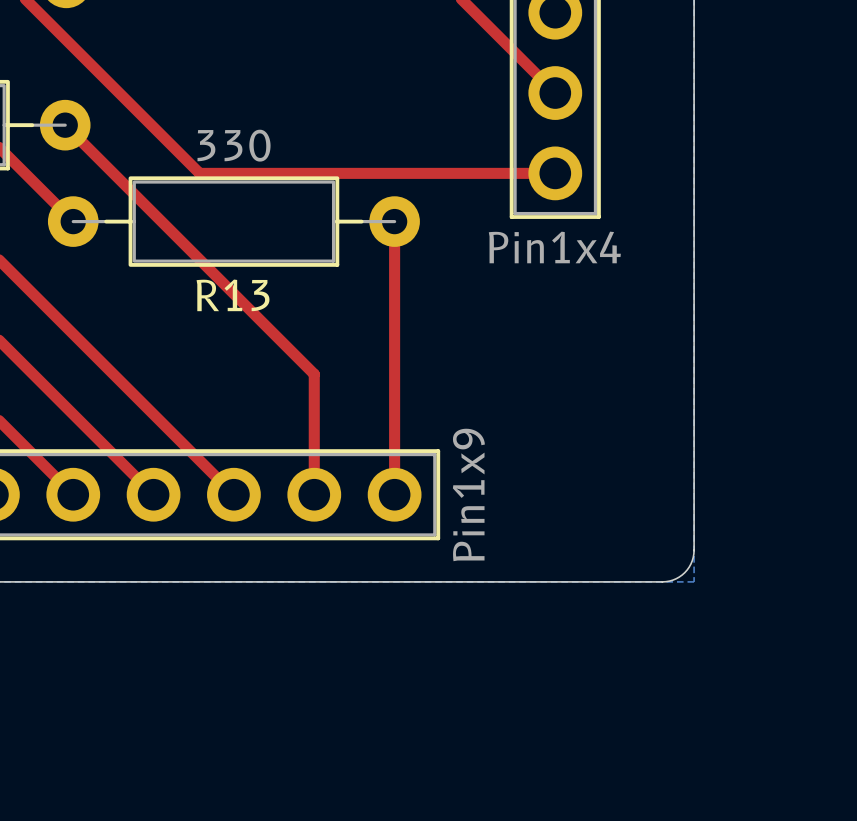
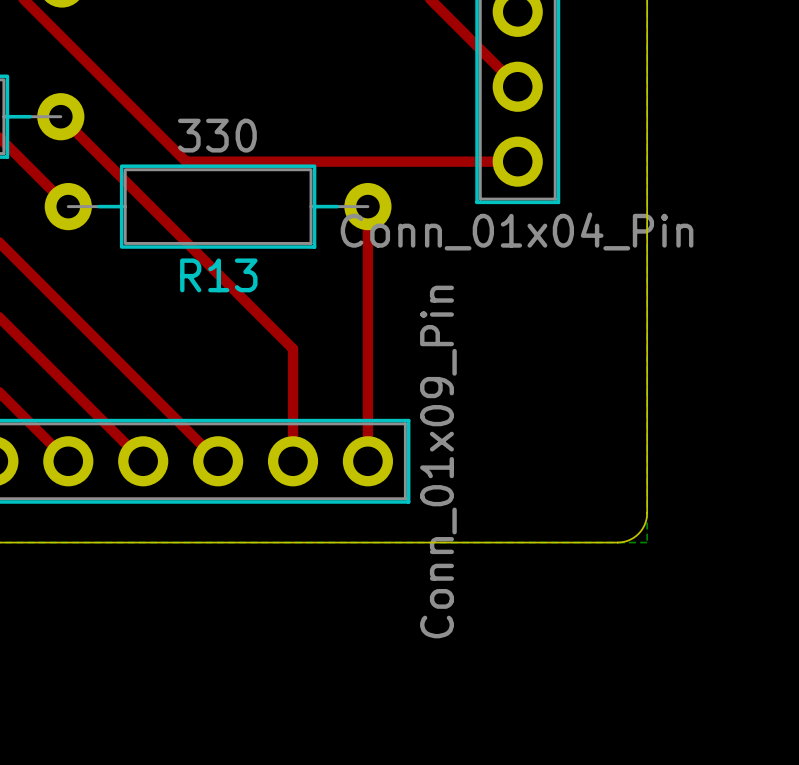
part value: Pin1x4 (554, 247) -> Conn_01x04_Pin (517, 231)
part value: Pin1x9 (468, 494) -> Conn_01x09_Pin (438, 461)

